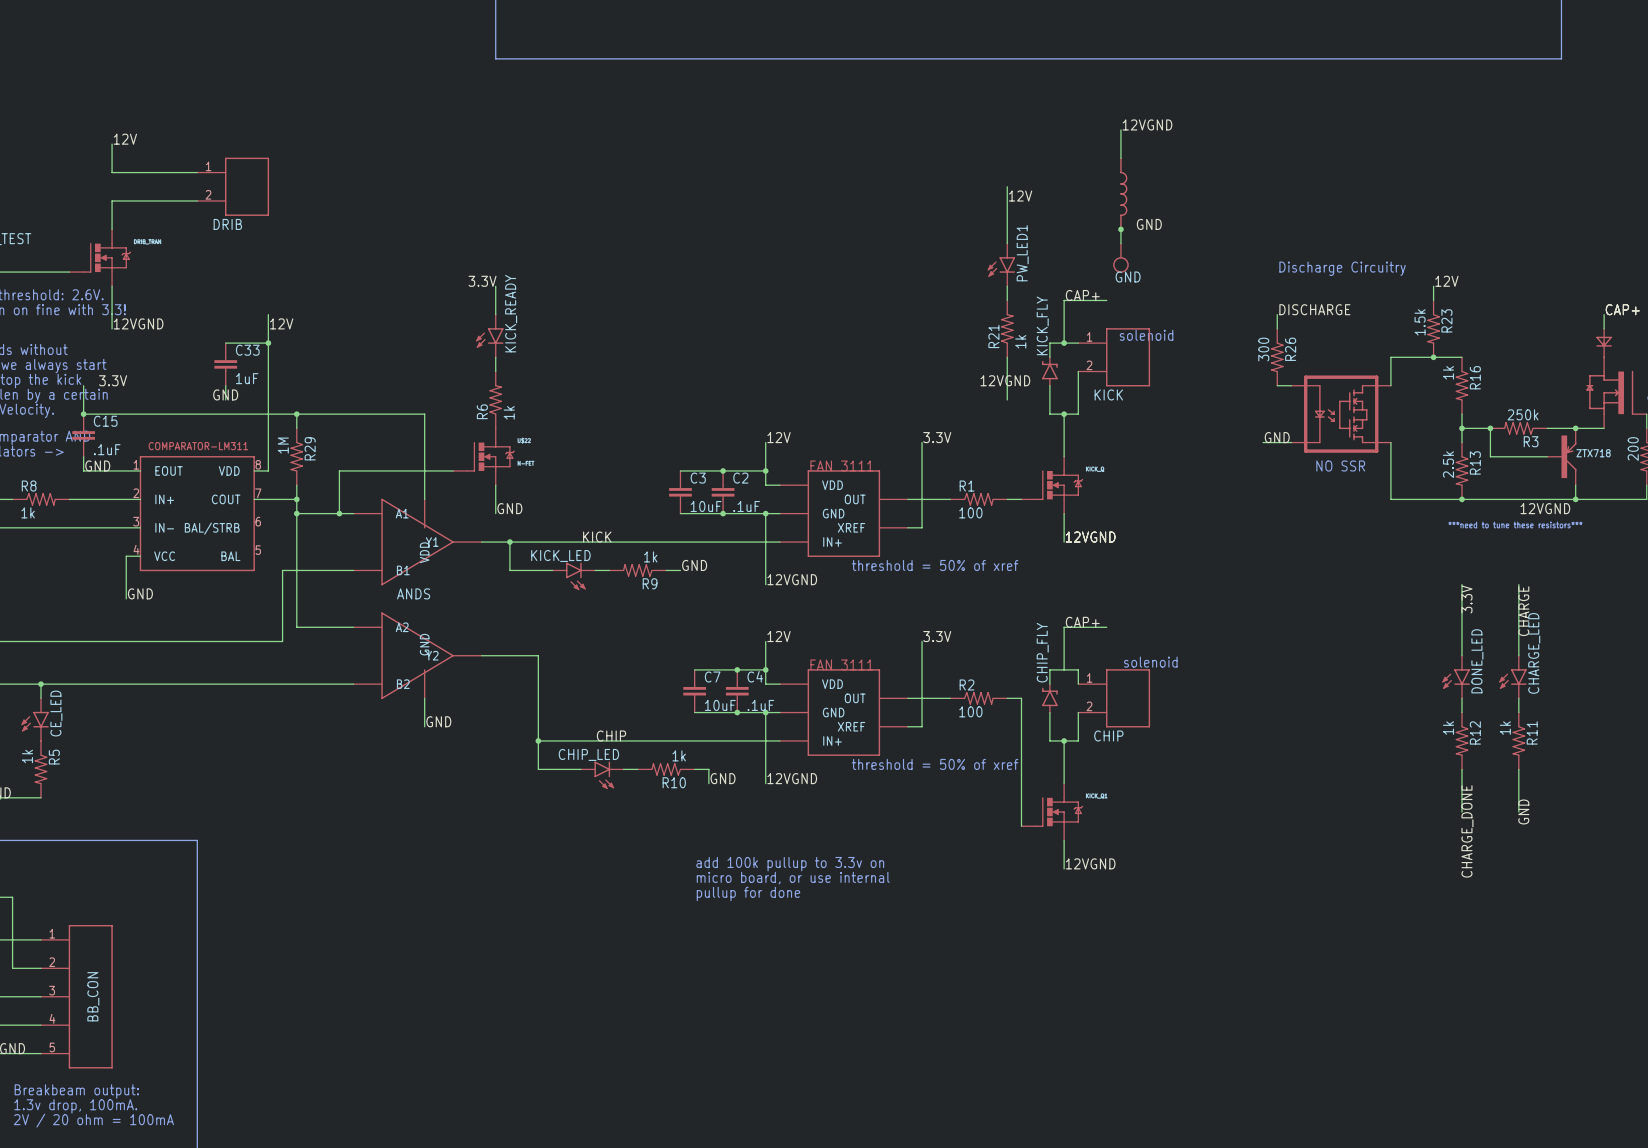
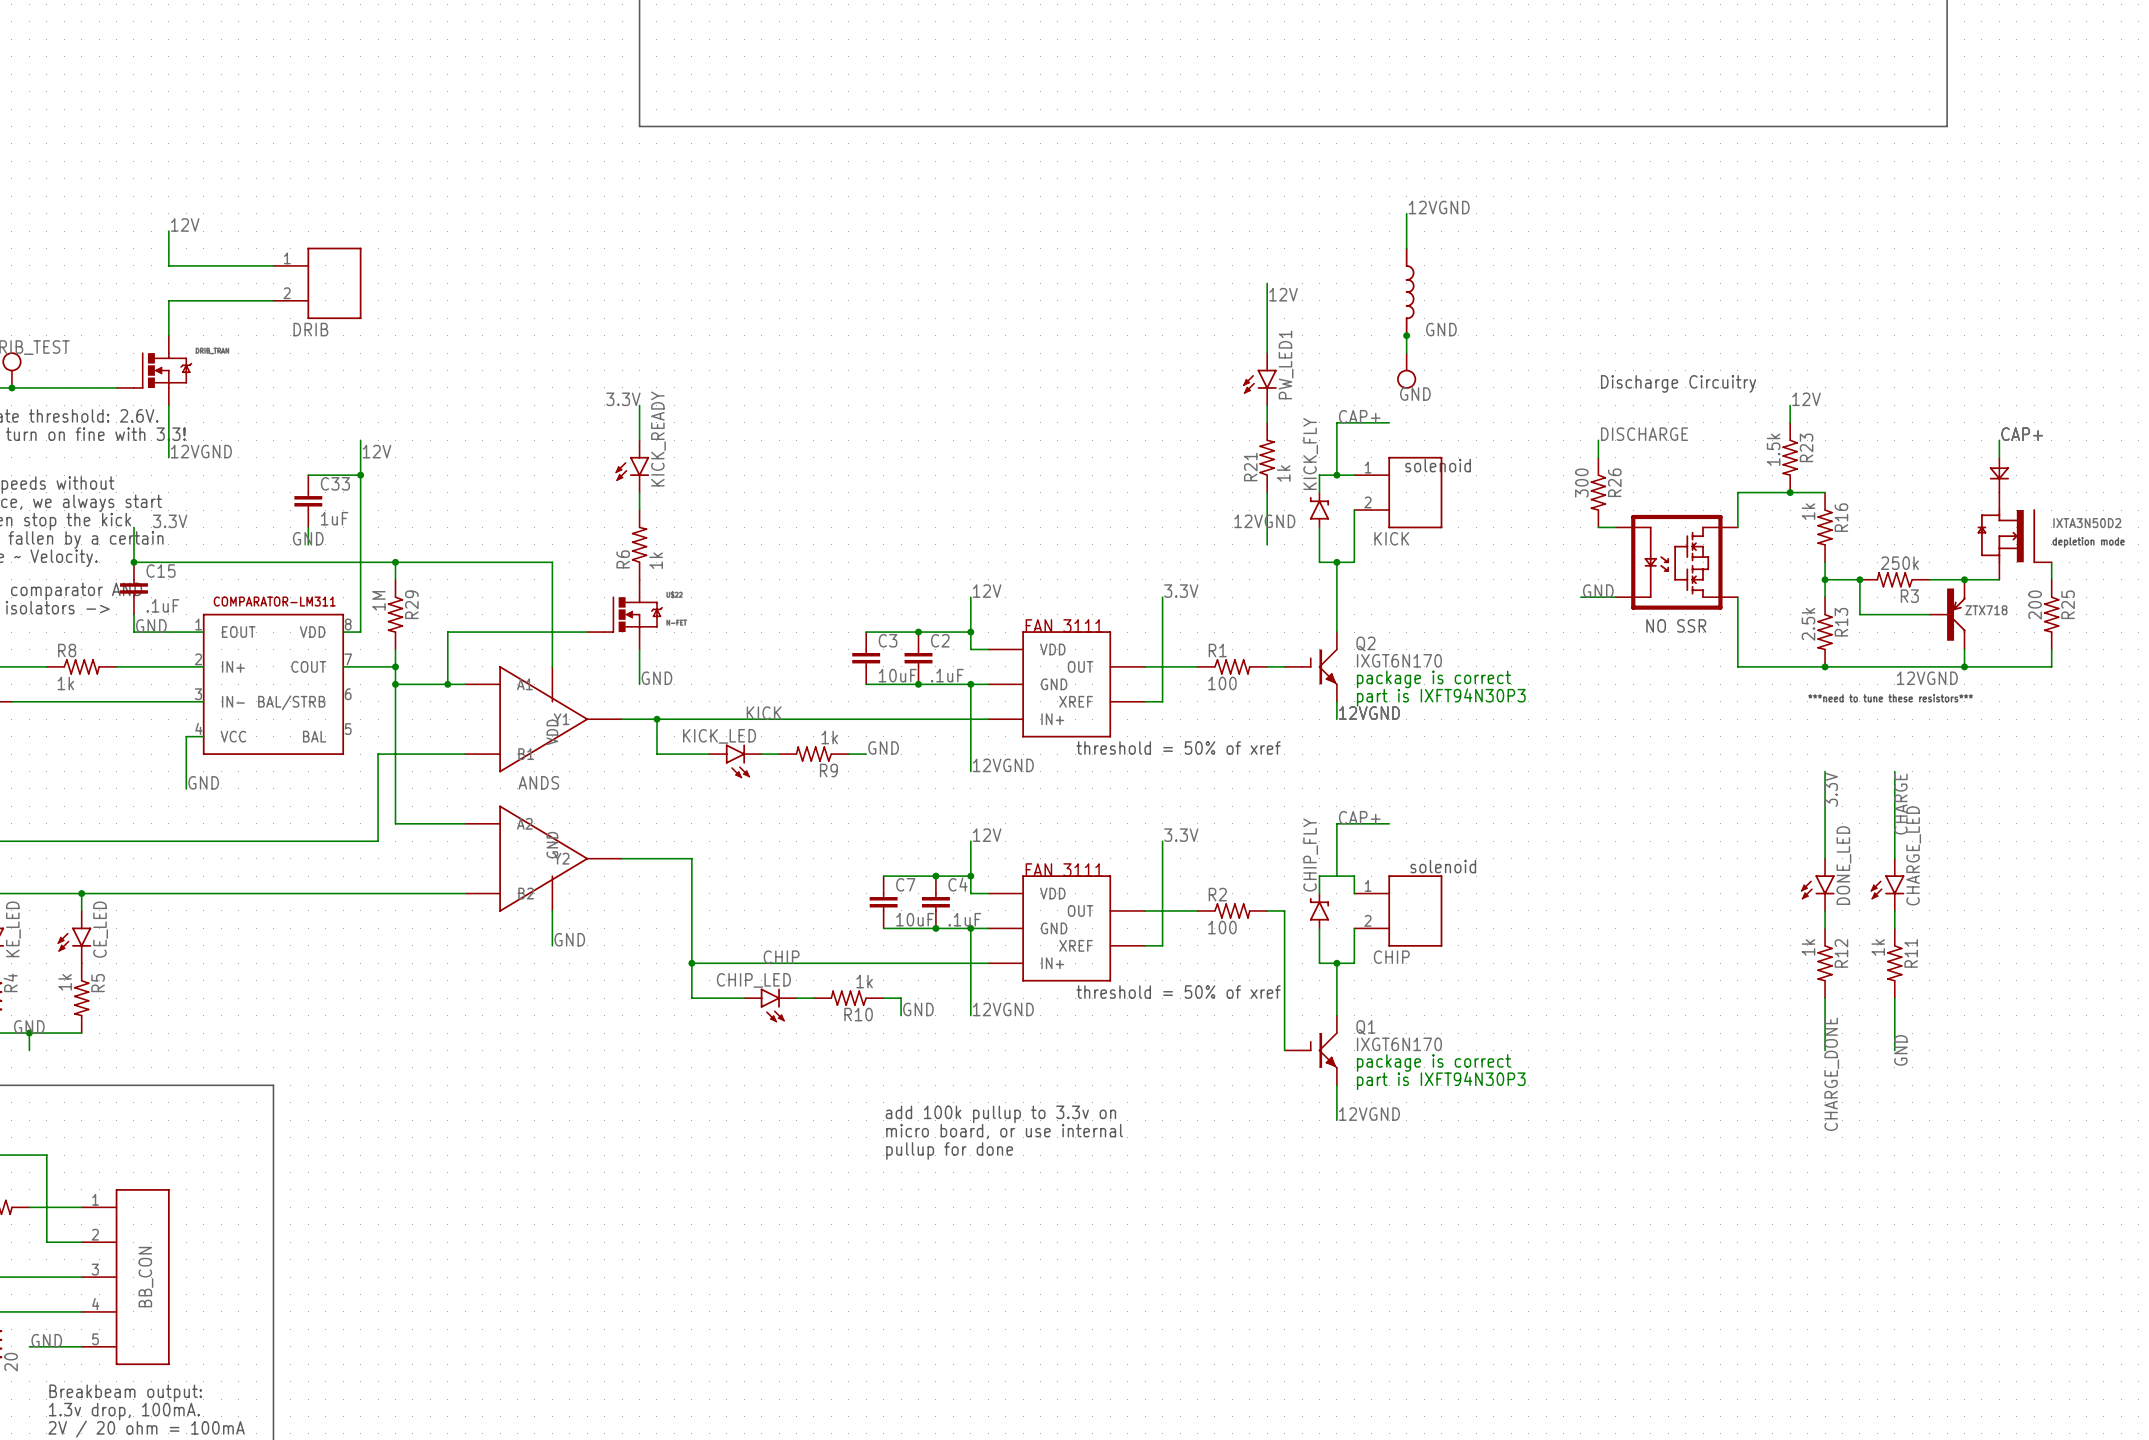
part: (1052, 485) -> none
Q2: none -> IXGT6N170 (1311, 666)
text: none -> package is correct (1433, 679)
text: none -> part is IXFT94N30P3 (1441, 697)
wire: (1021, 812) (1021, 826) -> none
Q1: none -> IXGT6N170 (1311, 1050)
part: (1052, 812) -> none
text: none -> package is correct (1433, 1062)
text: none -> part is IXFT94N30P3 (1441, 1080)

